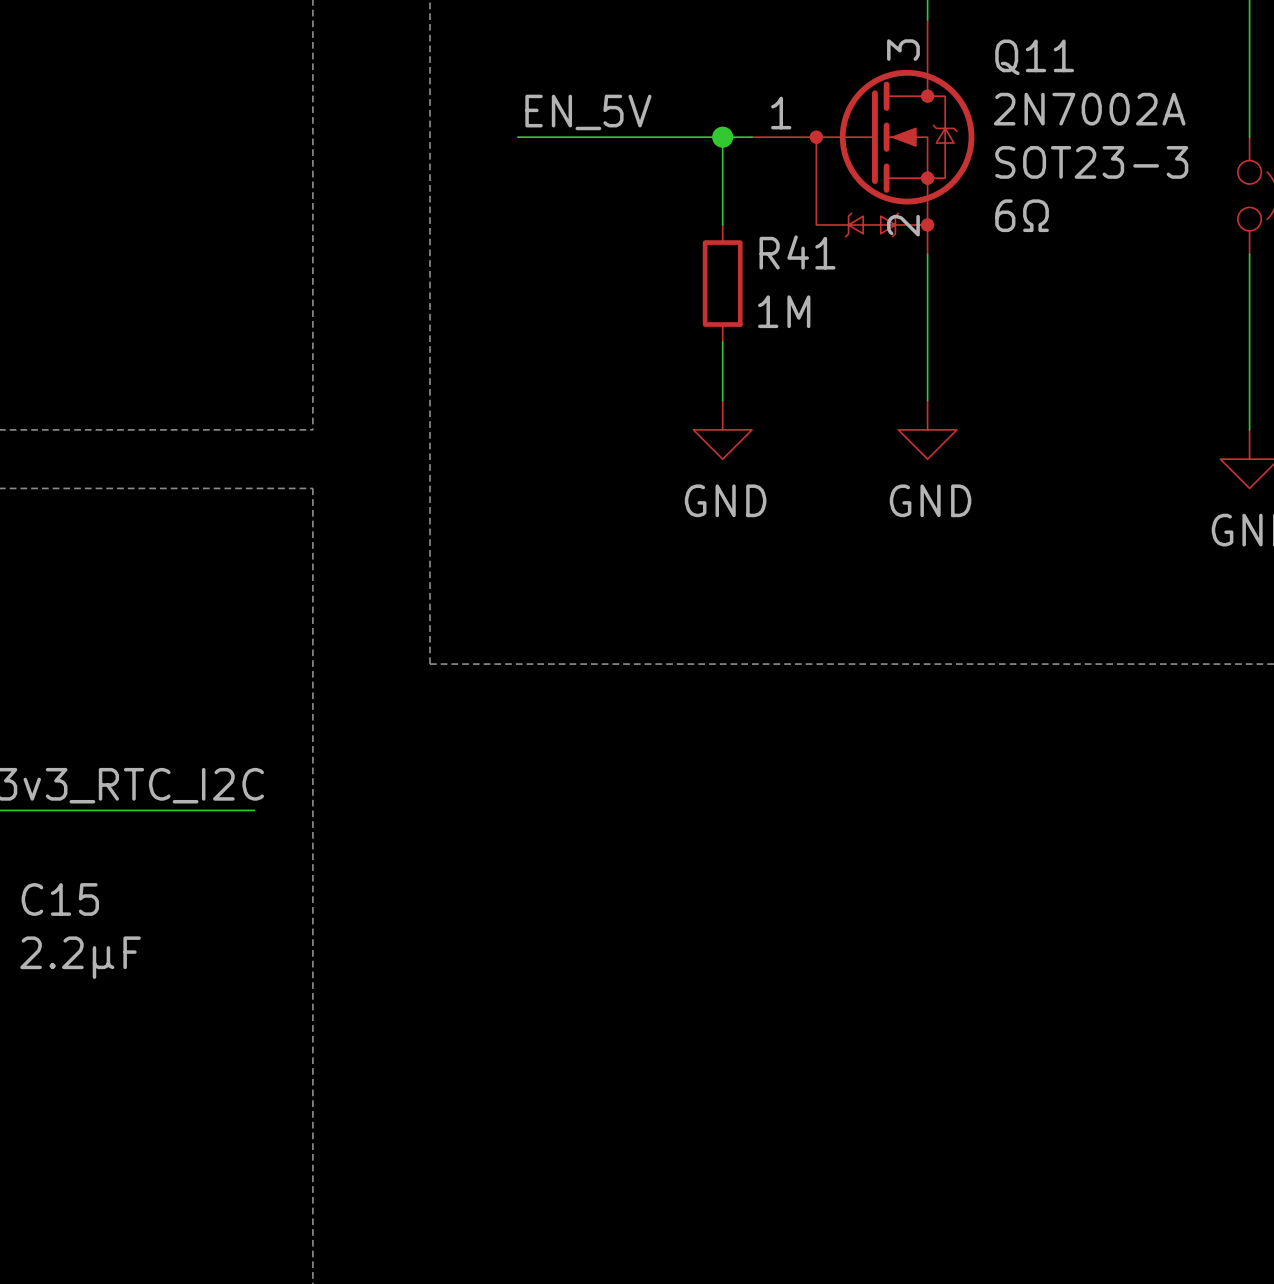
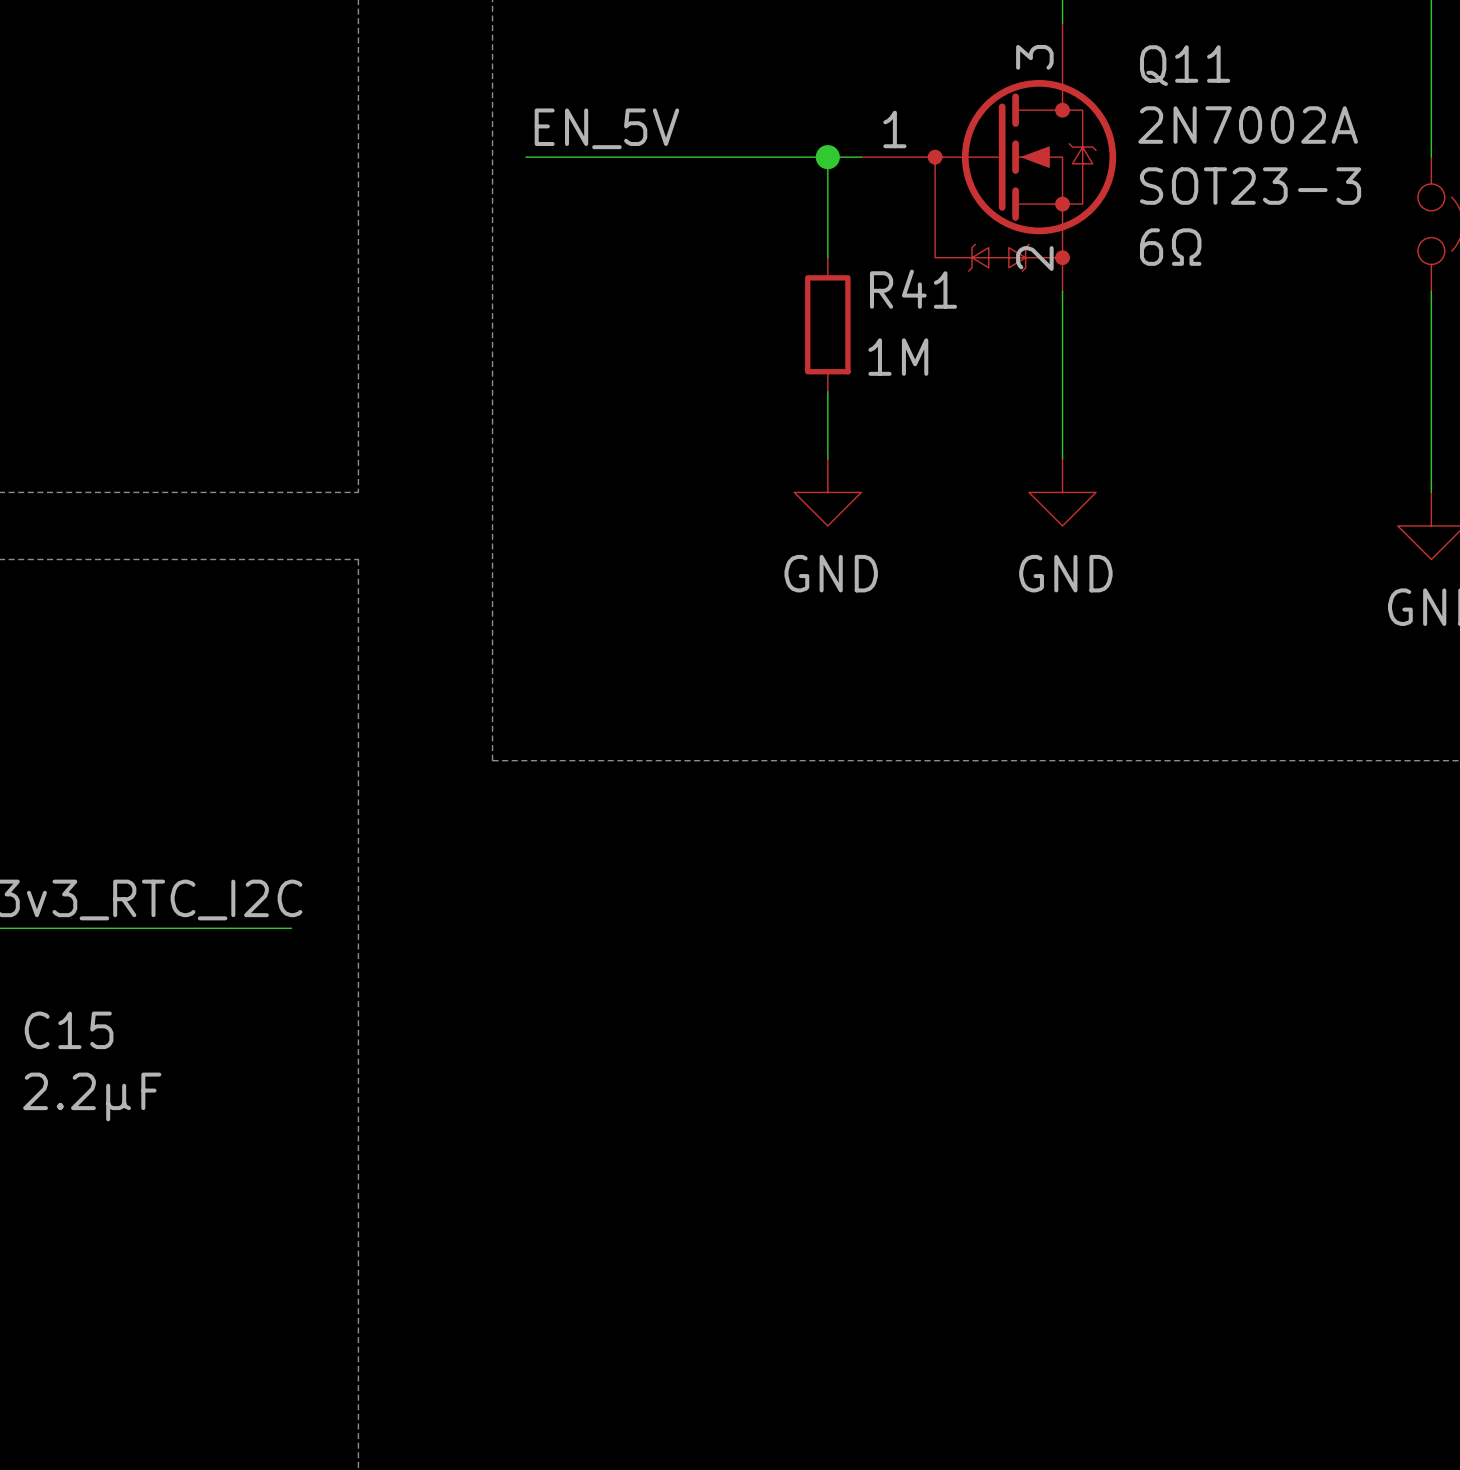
label position: EN_5V (588, 112) -> EN_5V (606, 128)
wire: none -> (526, 157) (593, 157)

